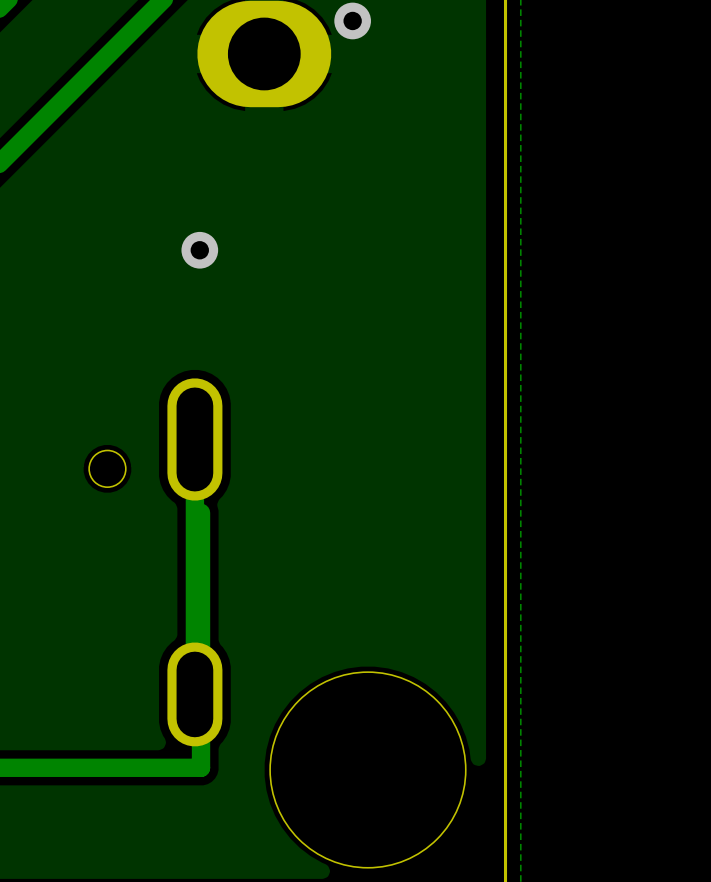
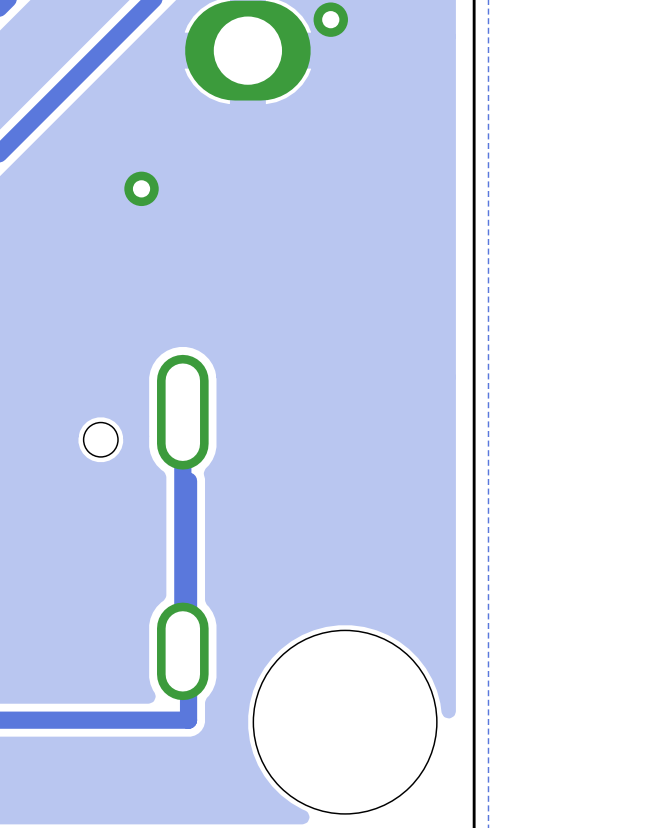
via position: (199, 250) -> (141, 188)

